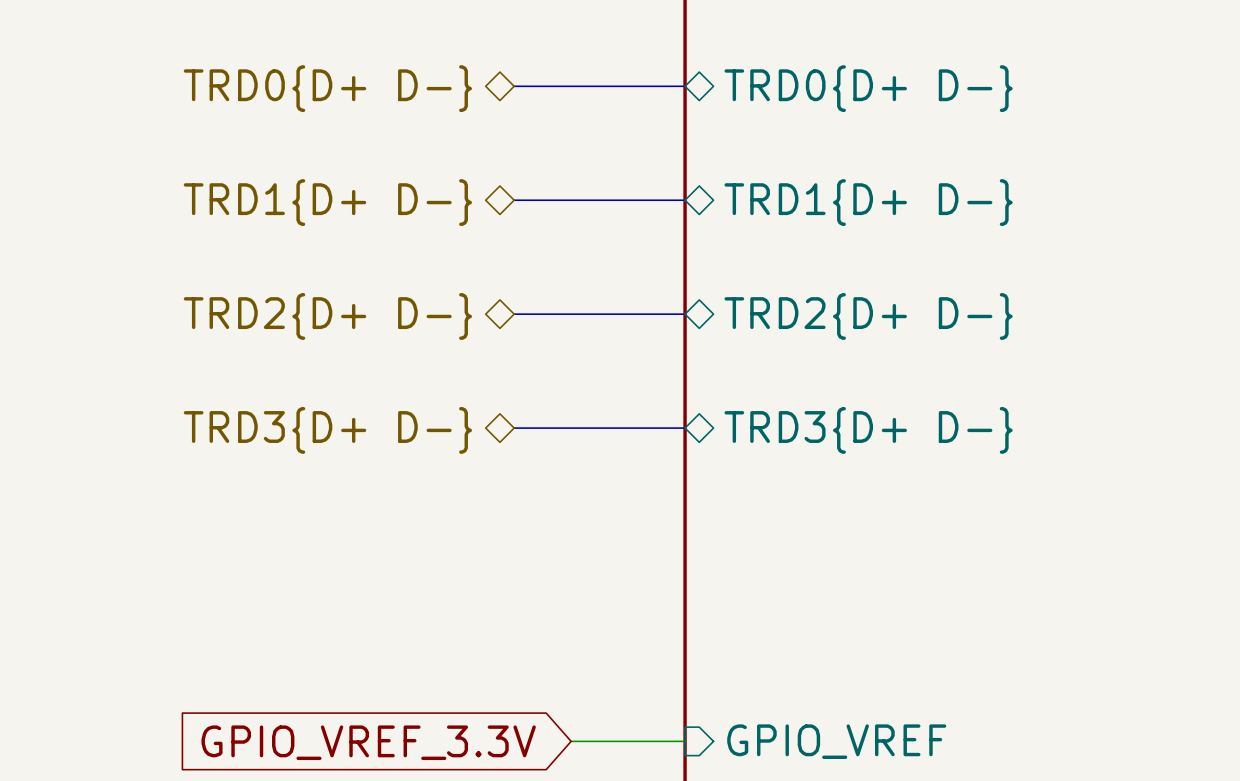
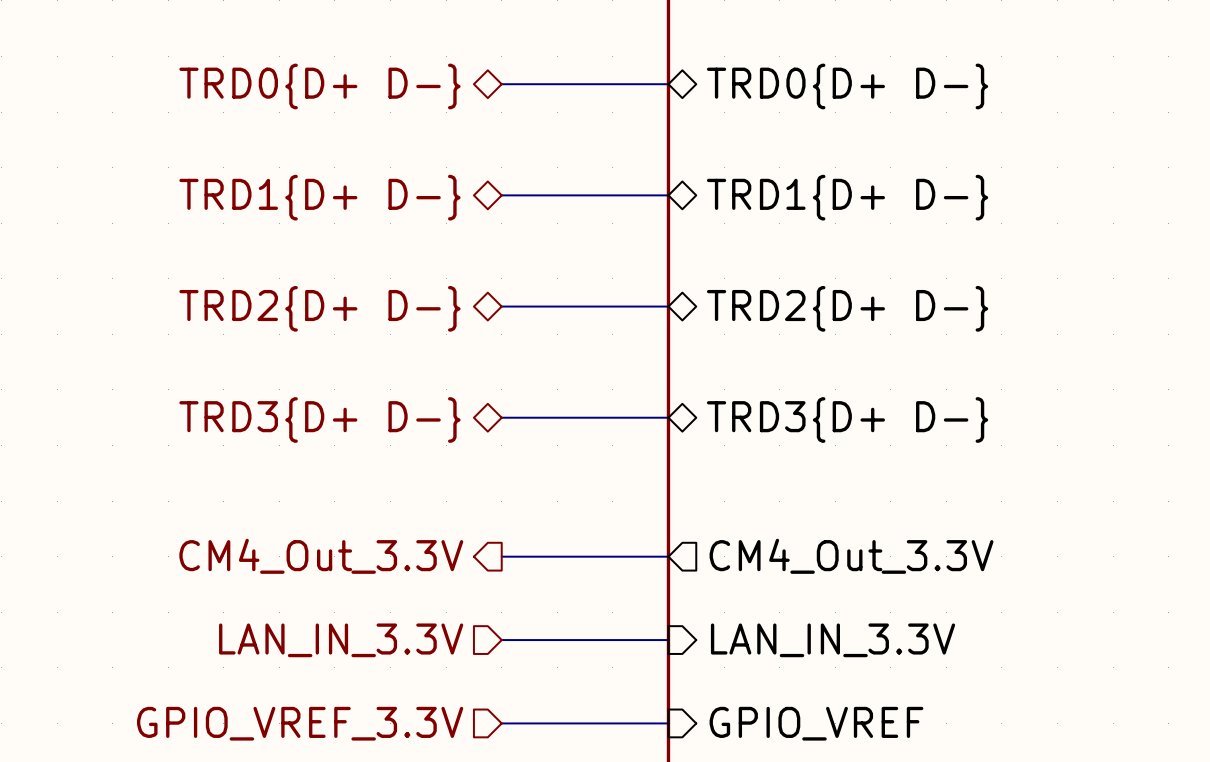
hierarchical label: none -> CM4_Out_3.3V (321, 556)
wire: none -> (501, 556) (668, 556)
sheet pin: none -> CM4_Out_3.3V (851, 556)
wire: none -> (501, 640) (668, 640)
hierarchical label: none -> LAN_IN_3.3V (341, 640)
sheet pin: none -> LAN_IN_3.3V (833, 640)
hierarchical label: none -> GPIO_VREF_3.3V (300, 723)
wire: none -> (501, 723) (557, 723)
global label: GPIO_VREF_3.3V (368, 742) -> none

